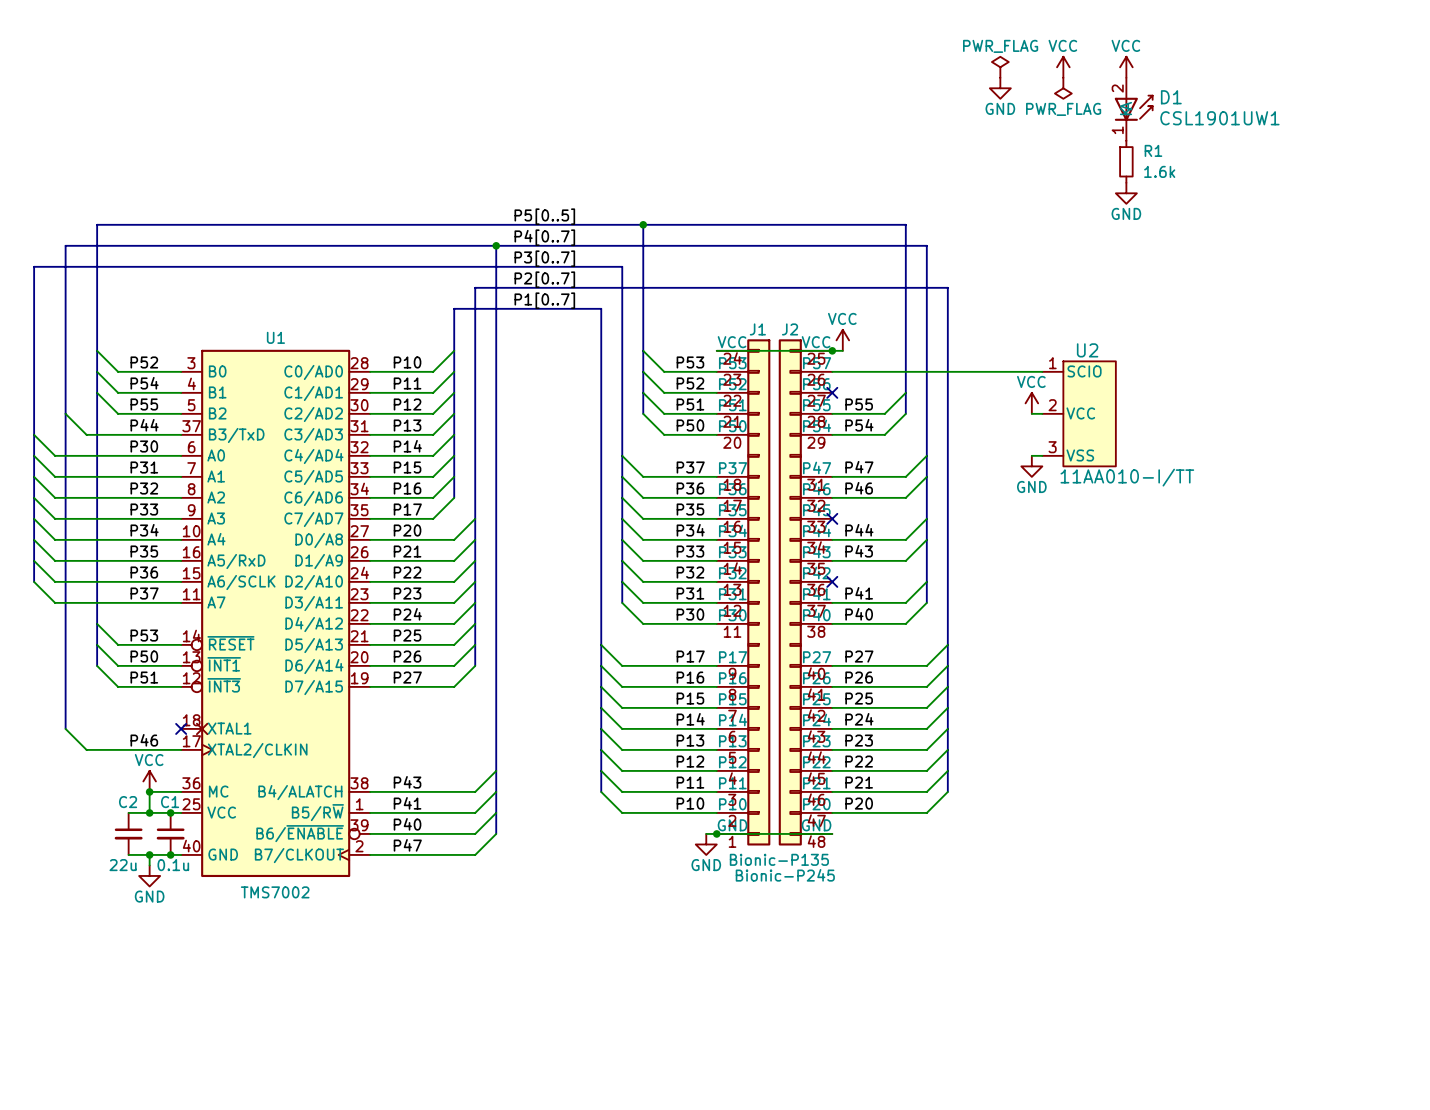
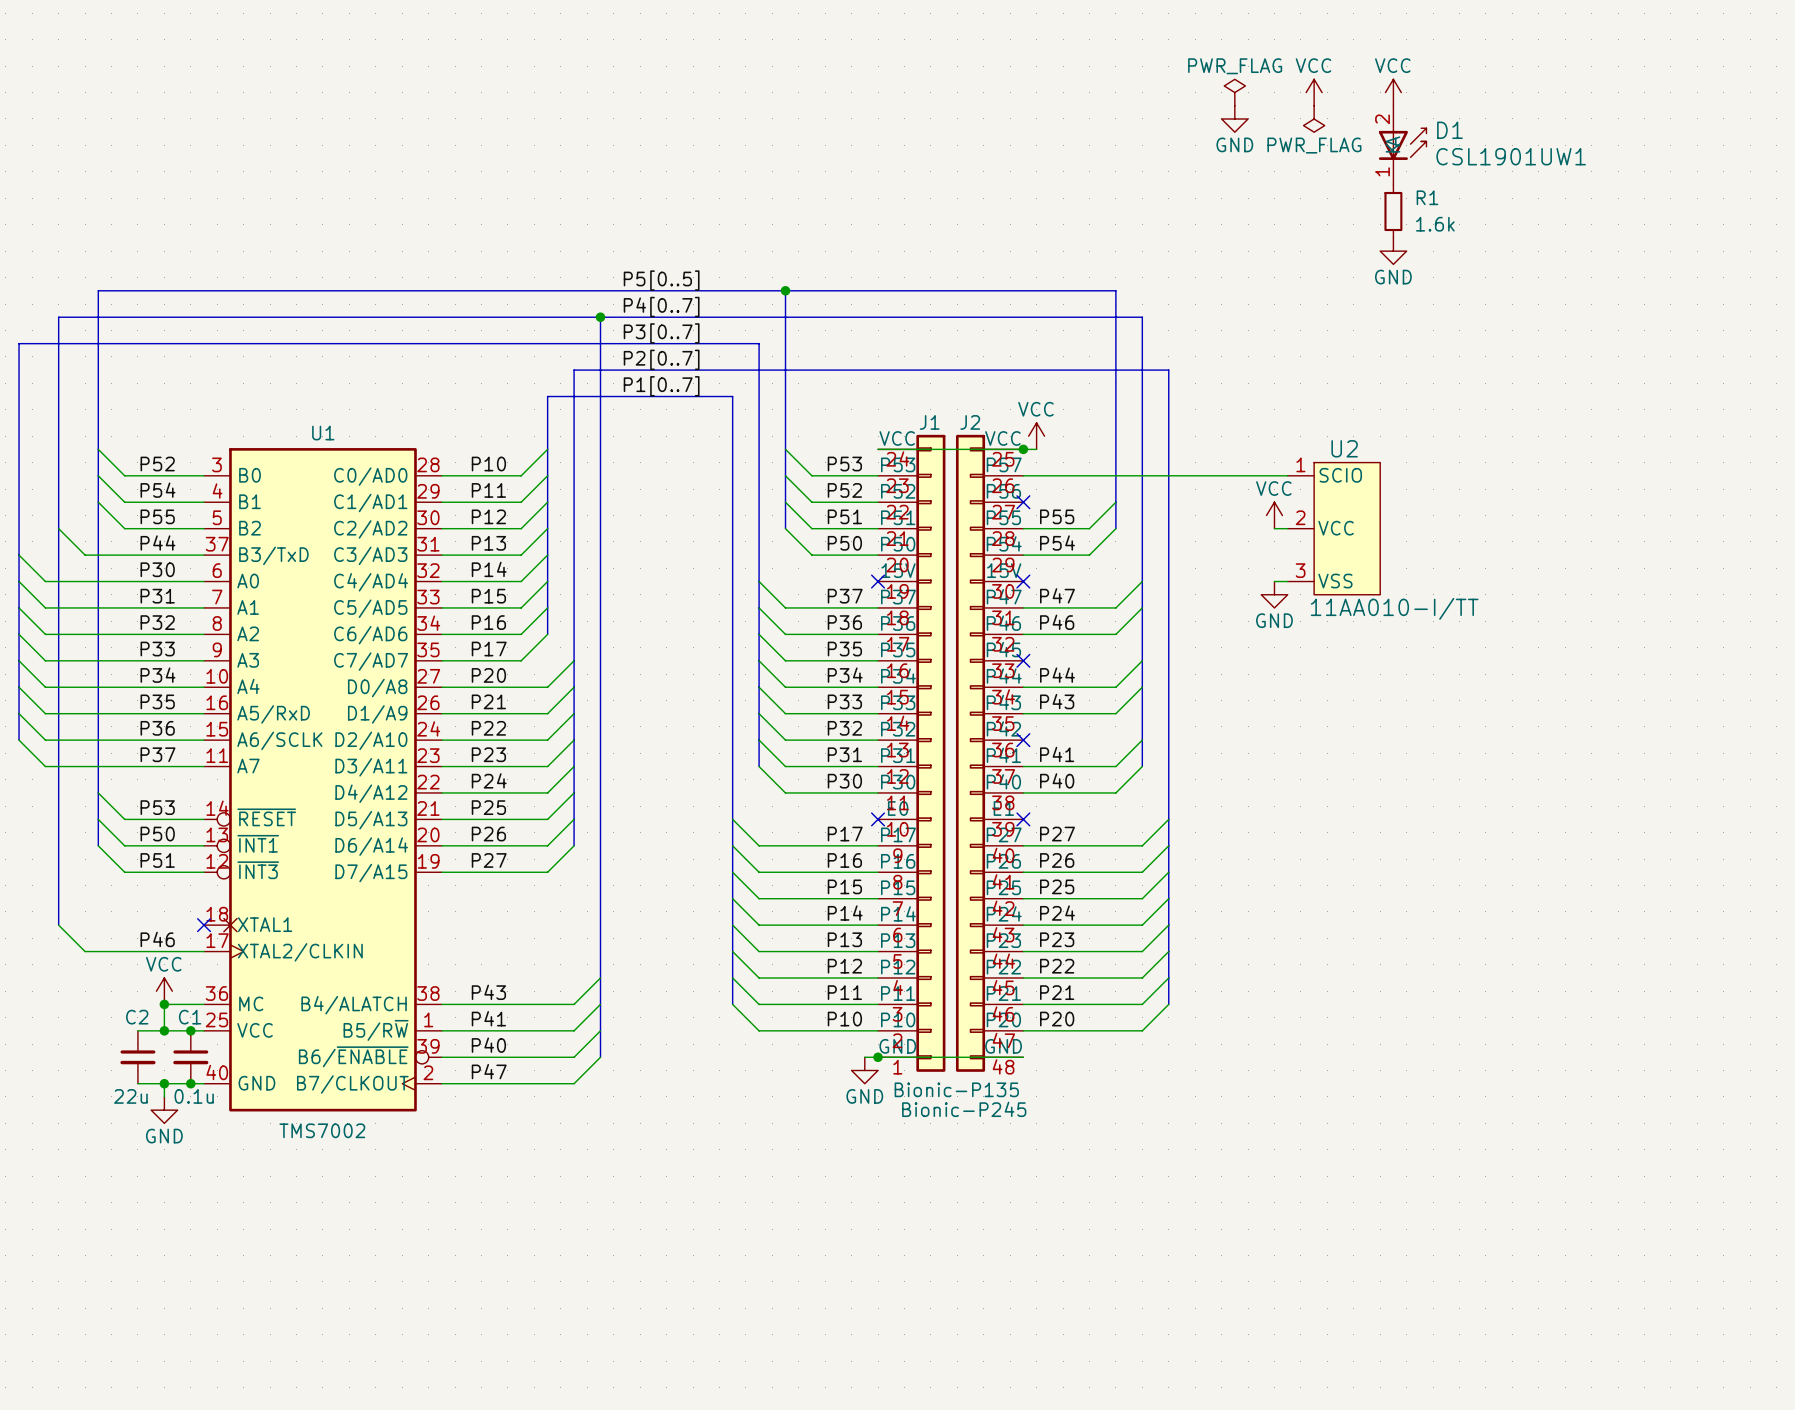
J1 symbol: [716, 339, 771, 846] -> [878, 434, 946, 1072]
J2 symbol: [778, 339, 833, 846] -> [955, 434, 1024, 1072]
no-connect mark: none -> (878, 581)
no-connect mark: none -> (1023, 581)
no-connect mark: none -> (878, 819)
no-connect mark: none -> (1023, 819)

